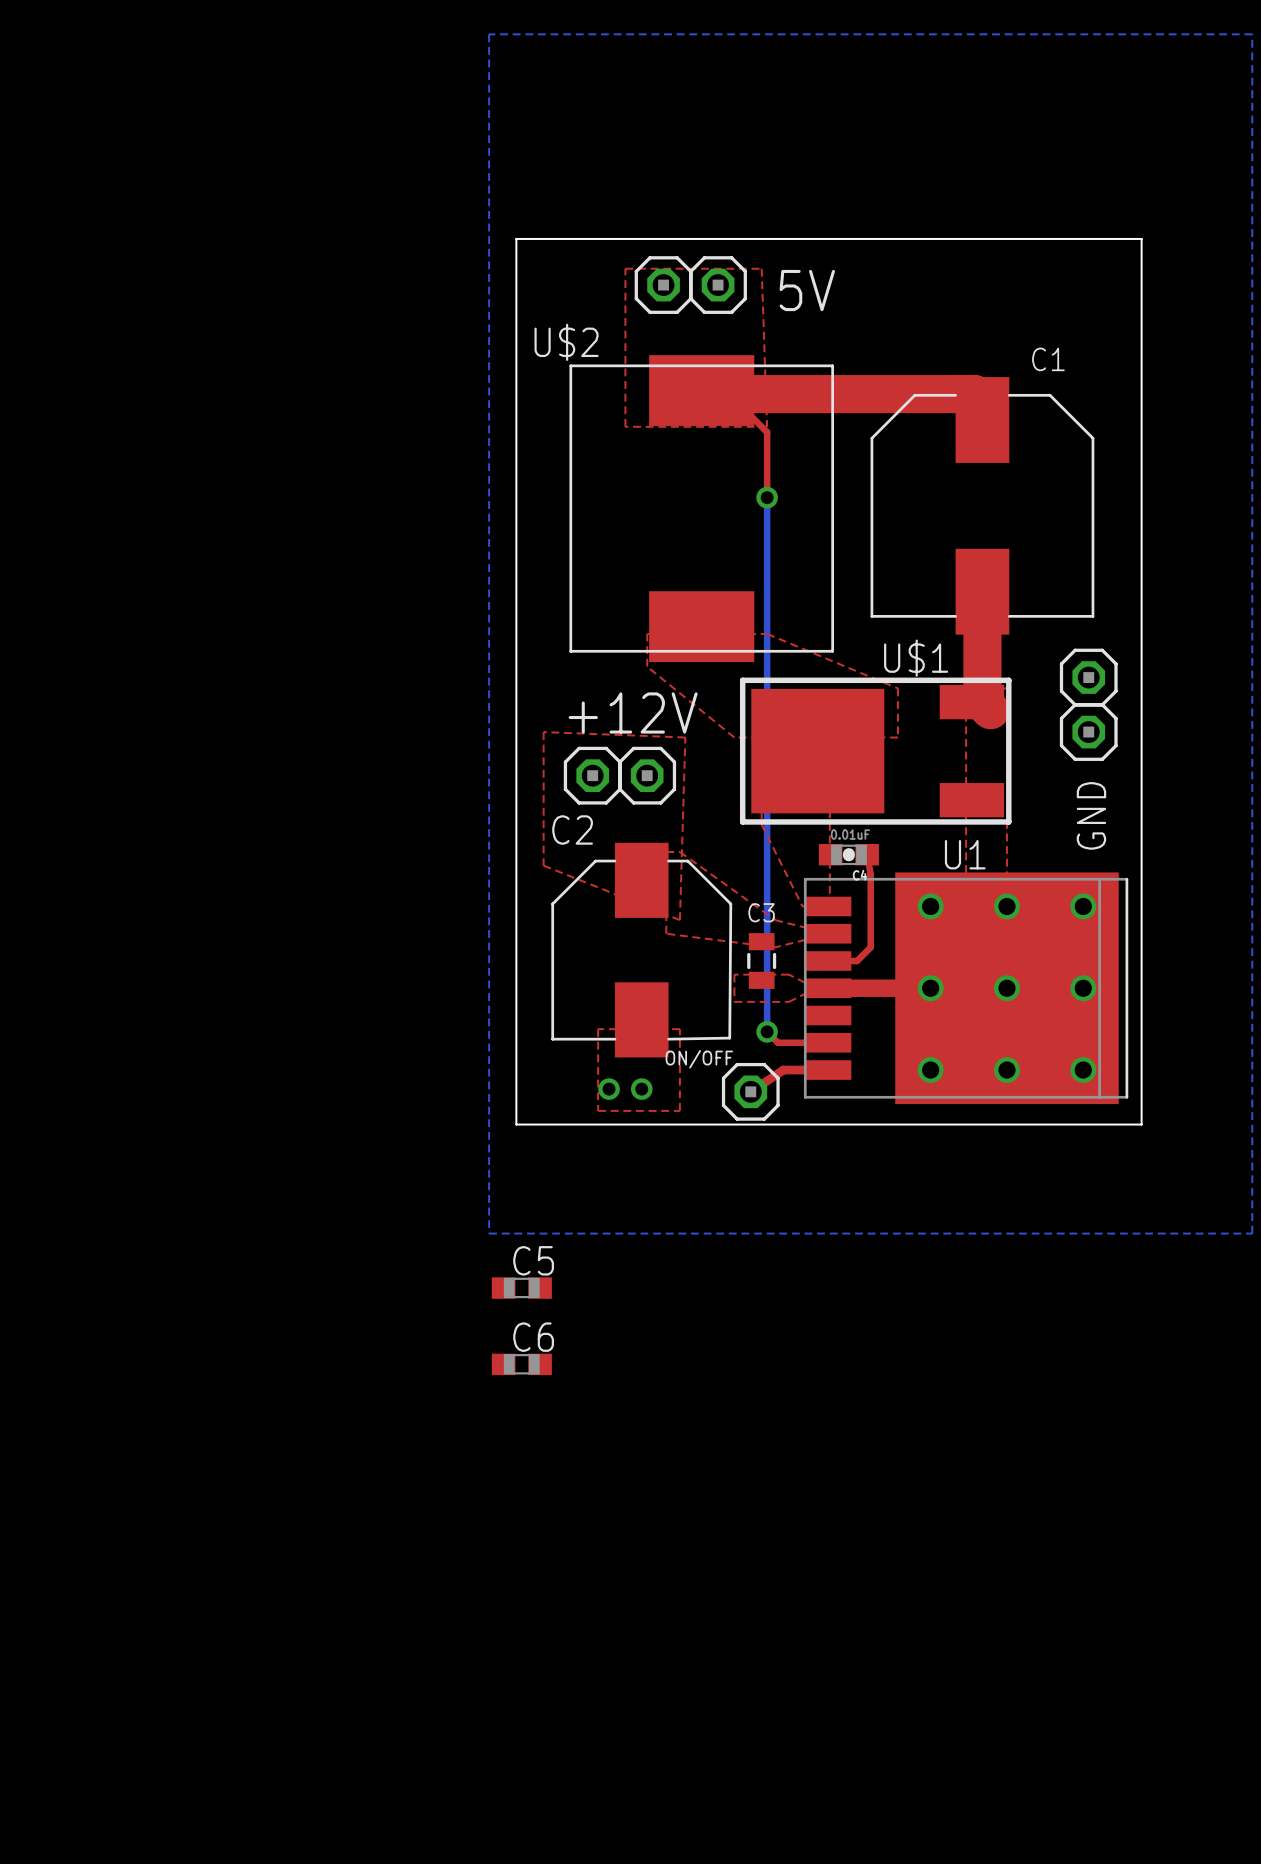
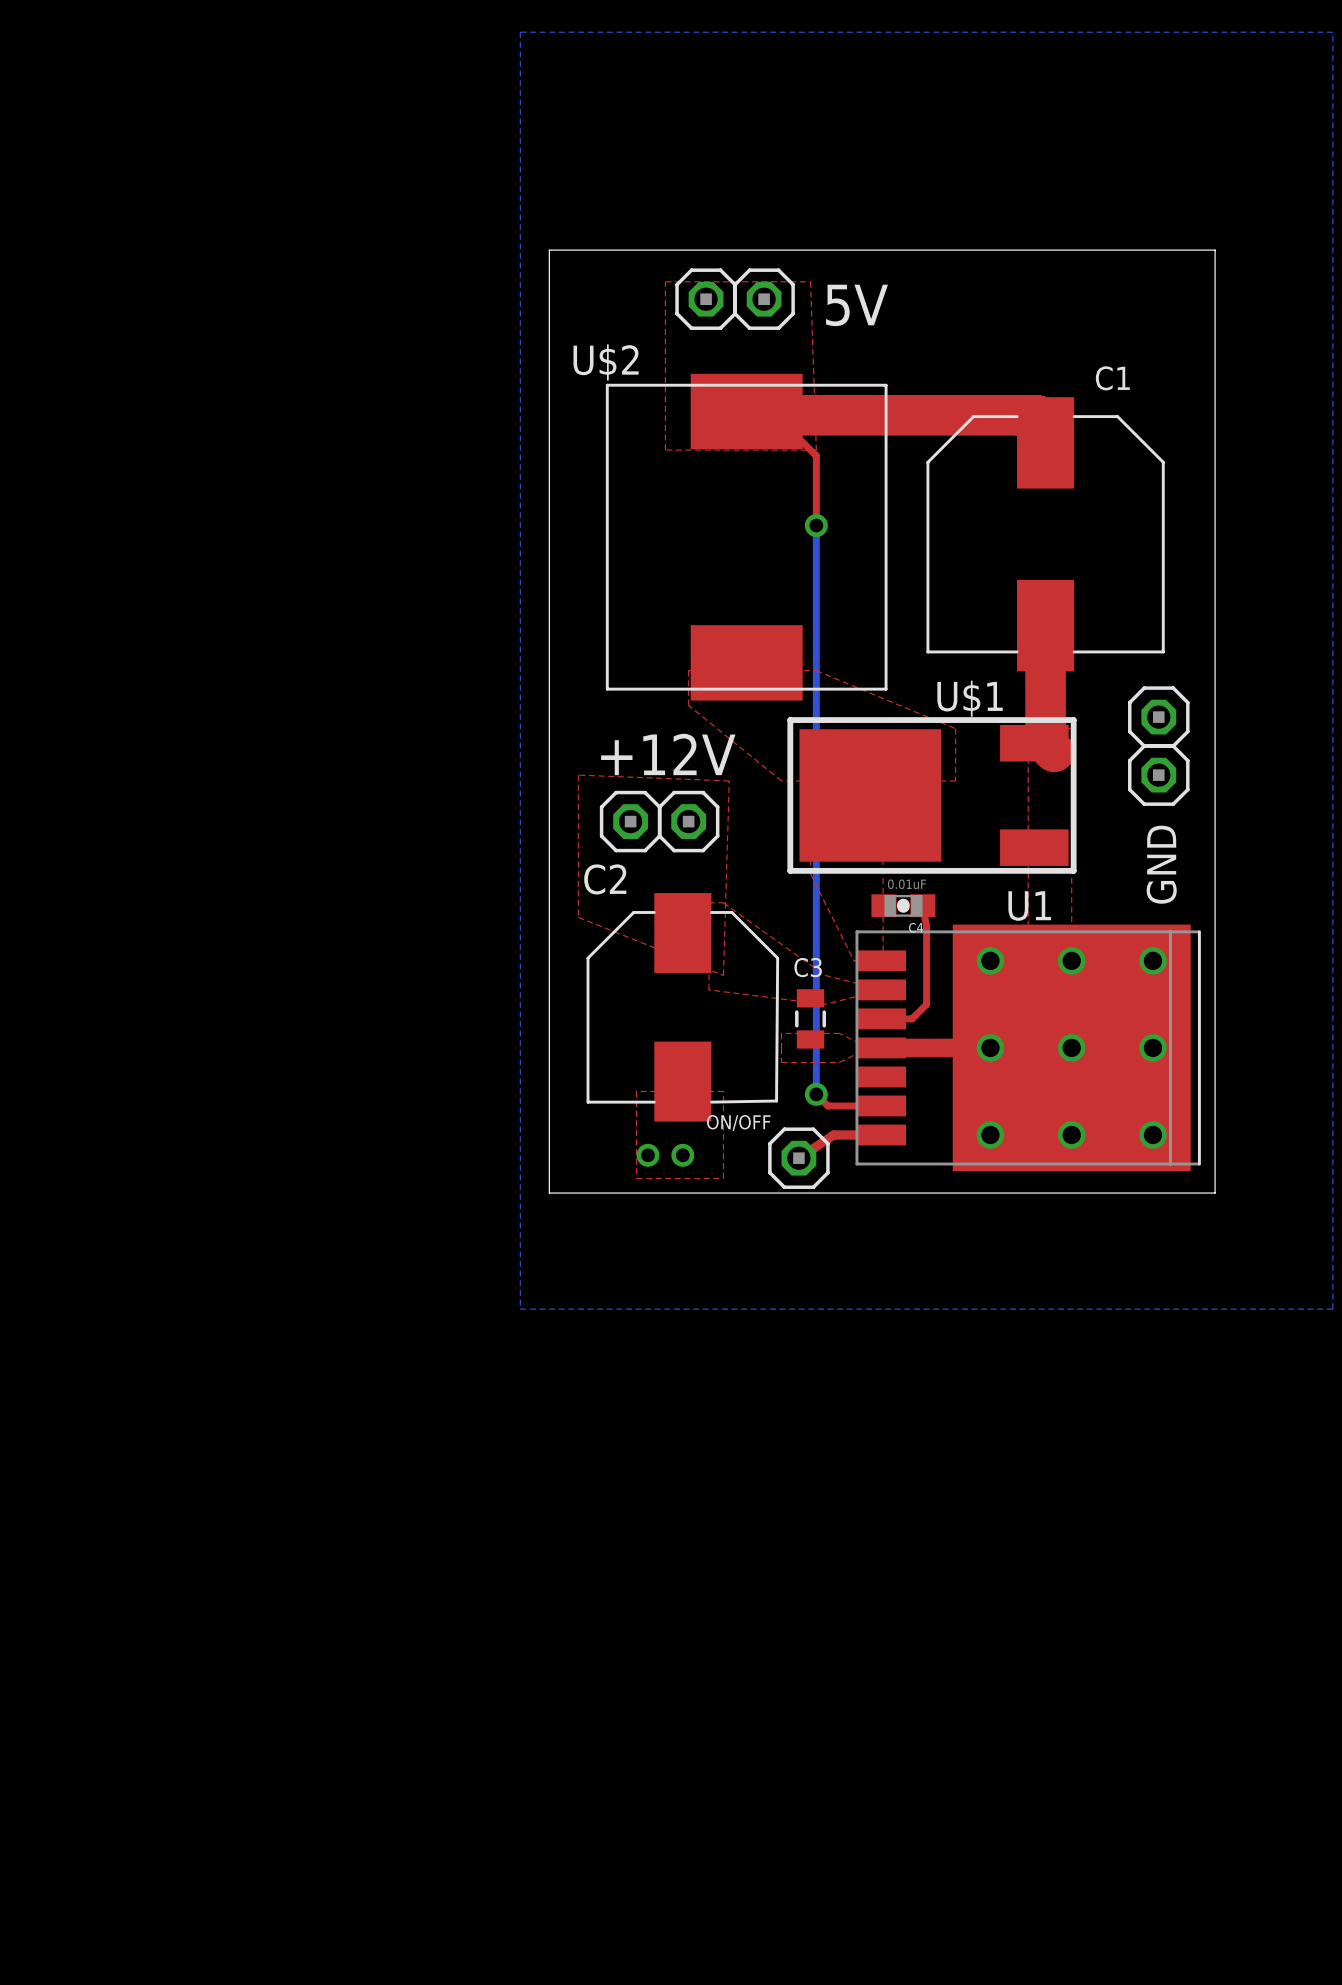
C5: (521, 1288) -> none
C6: (521, 1364) -> none

